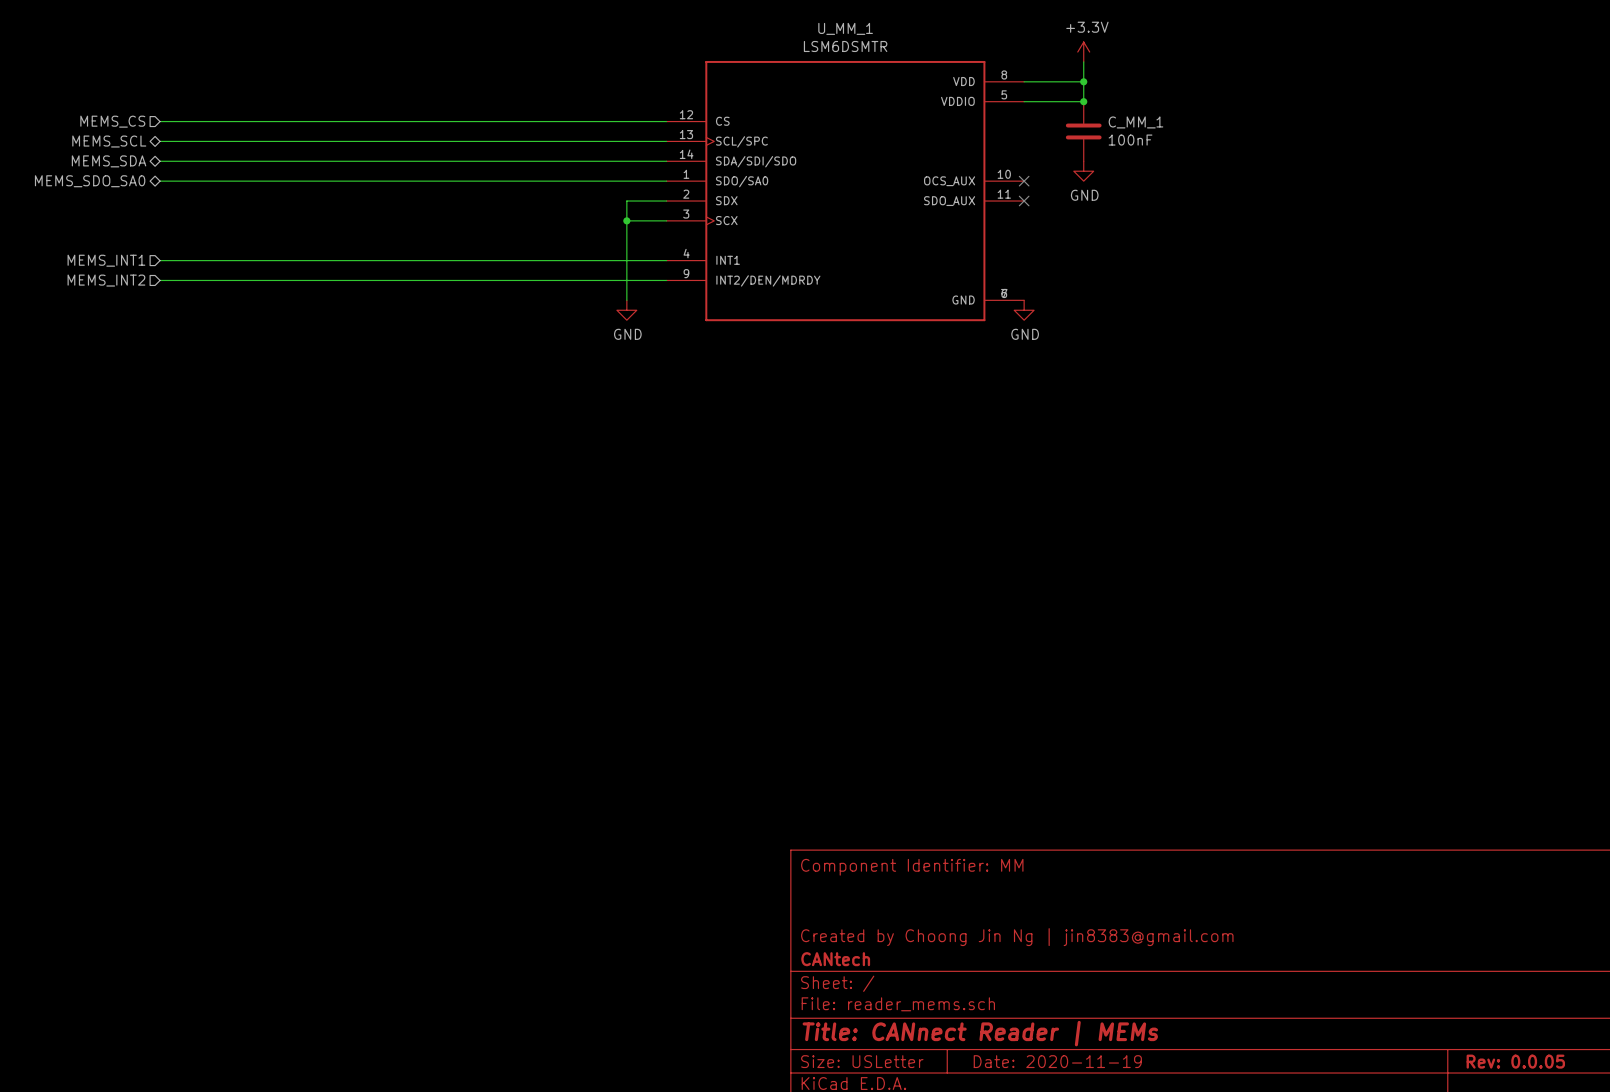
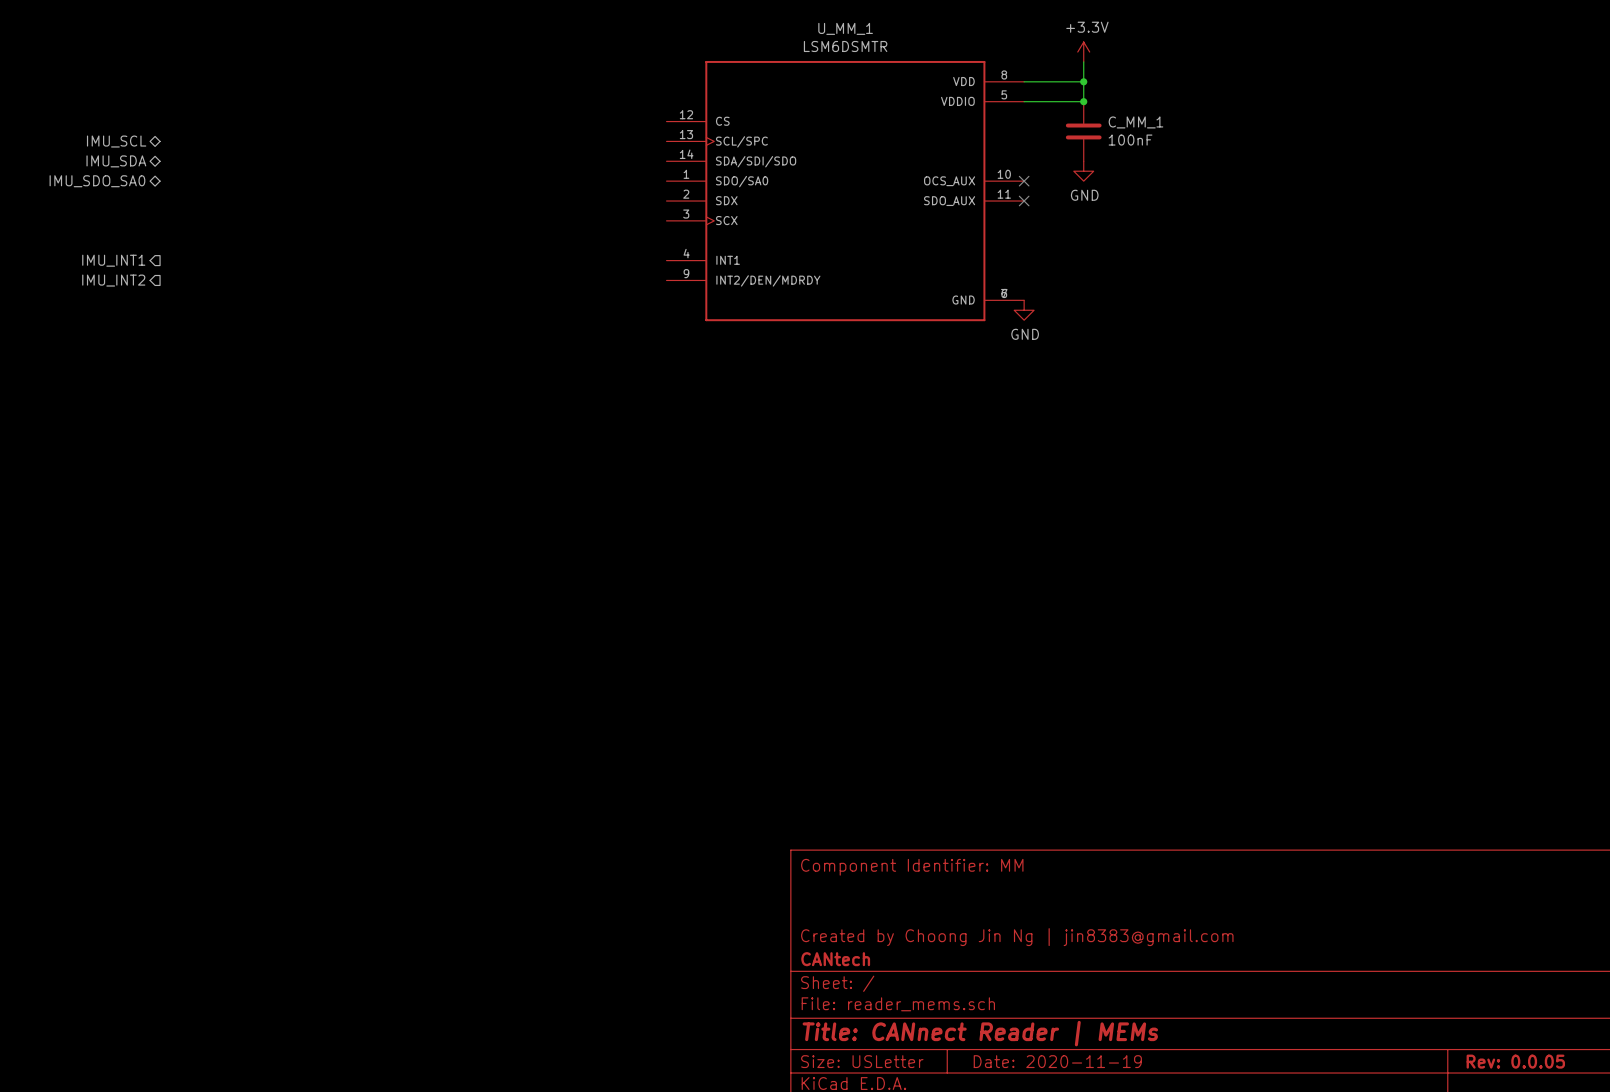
hierarchical label: MEMS_CS (112, 121) -> none
wire: (160, 121) (666, 121) -> none
hierarchical label: MEMS_SCL (109, 141) -> IMU_SCL (116, 141)
wire: (160, 141) (666, 141) -> none
hierarchical label: MEMS_SDA (109, 161) -> IMU_SDA (116, 161)
wire: (160, 161) (666, 161) -> none
hierarchical label: MEMS_SDO_SA0 (90, 181) -> IMU_SDO_SA0 (97, 181)
wire: (160, 181) (666, 181) -> none
wire: (666, 201) (626, 201) (626, 300) -> none
wire: (626, 220) (666, 220) -> none
junction: (626, 220) -> none
hierarchical label shape: input (106, 260) -> output (113, 260)
hierarchical label: MEMS_INT1 (106, 260) -> IMU_INT1 (113, 260)
wire: (160, 260) (666, 260) -> none
hierarchical label shape: input (106, 280) -> output (113, 280)
hierarchical label: MEMS_INT2 (106, 280) -> IMU_INT2 (113, 280)
wire: (160, 280) (666, 280) -> none
power symbol: GND (626, 310) -> none

